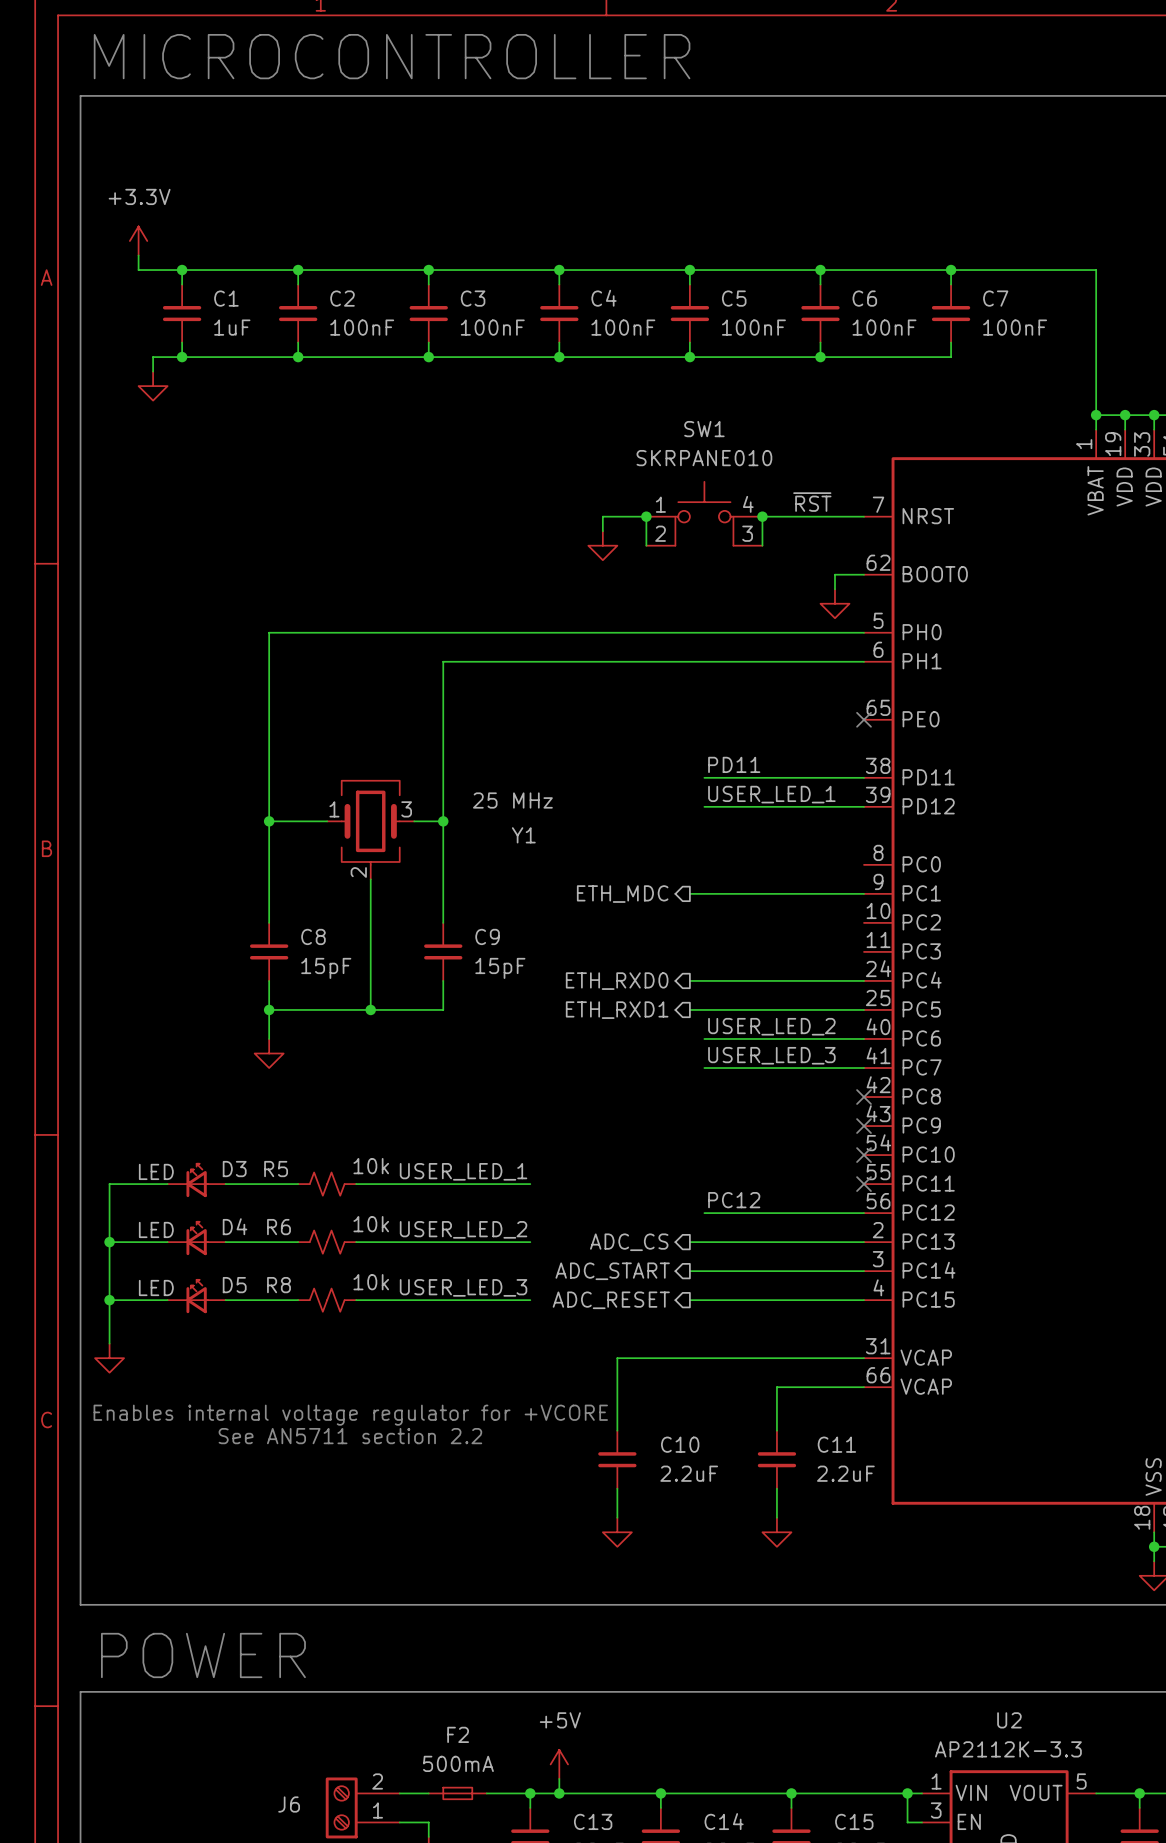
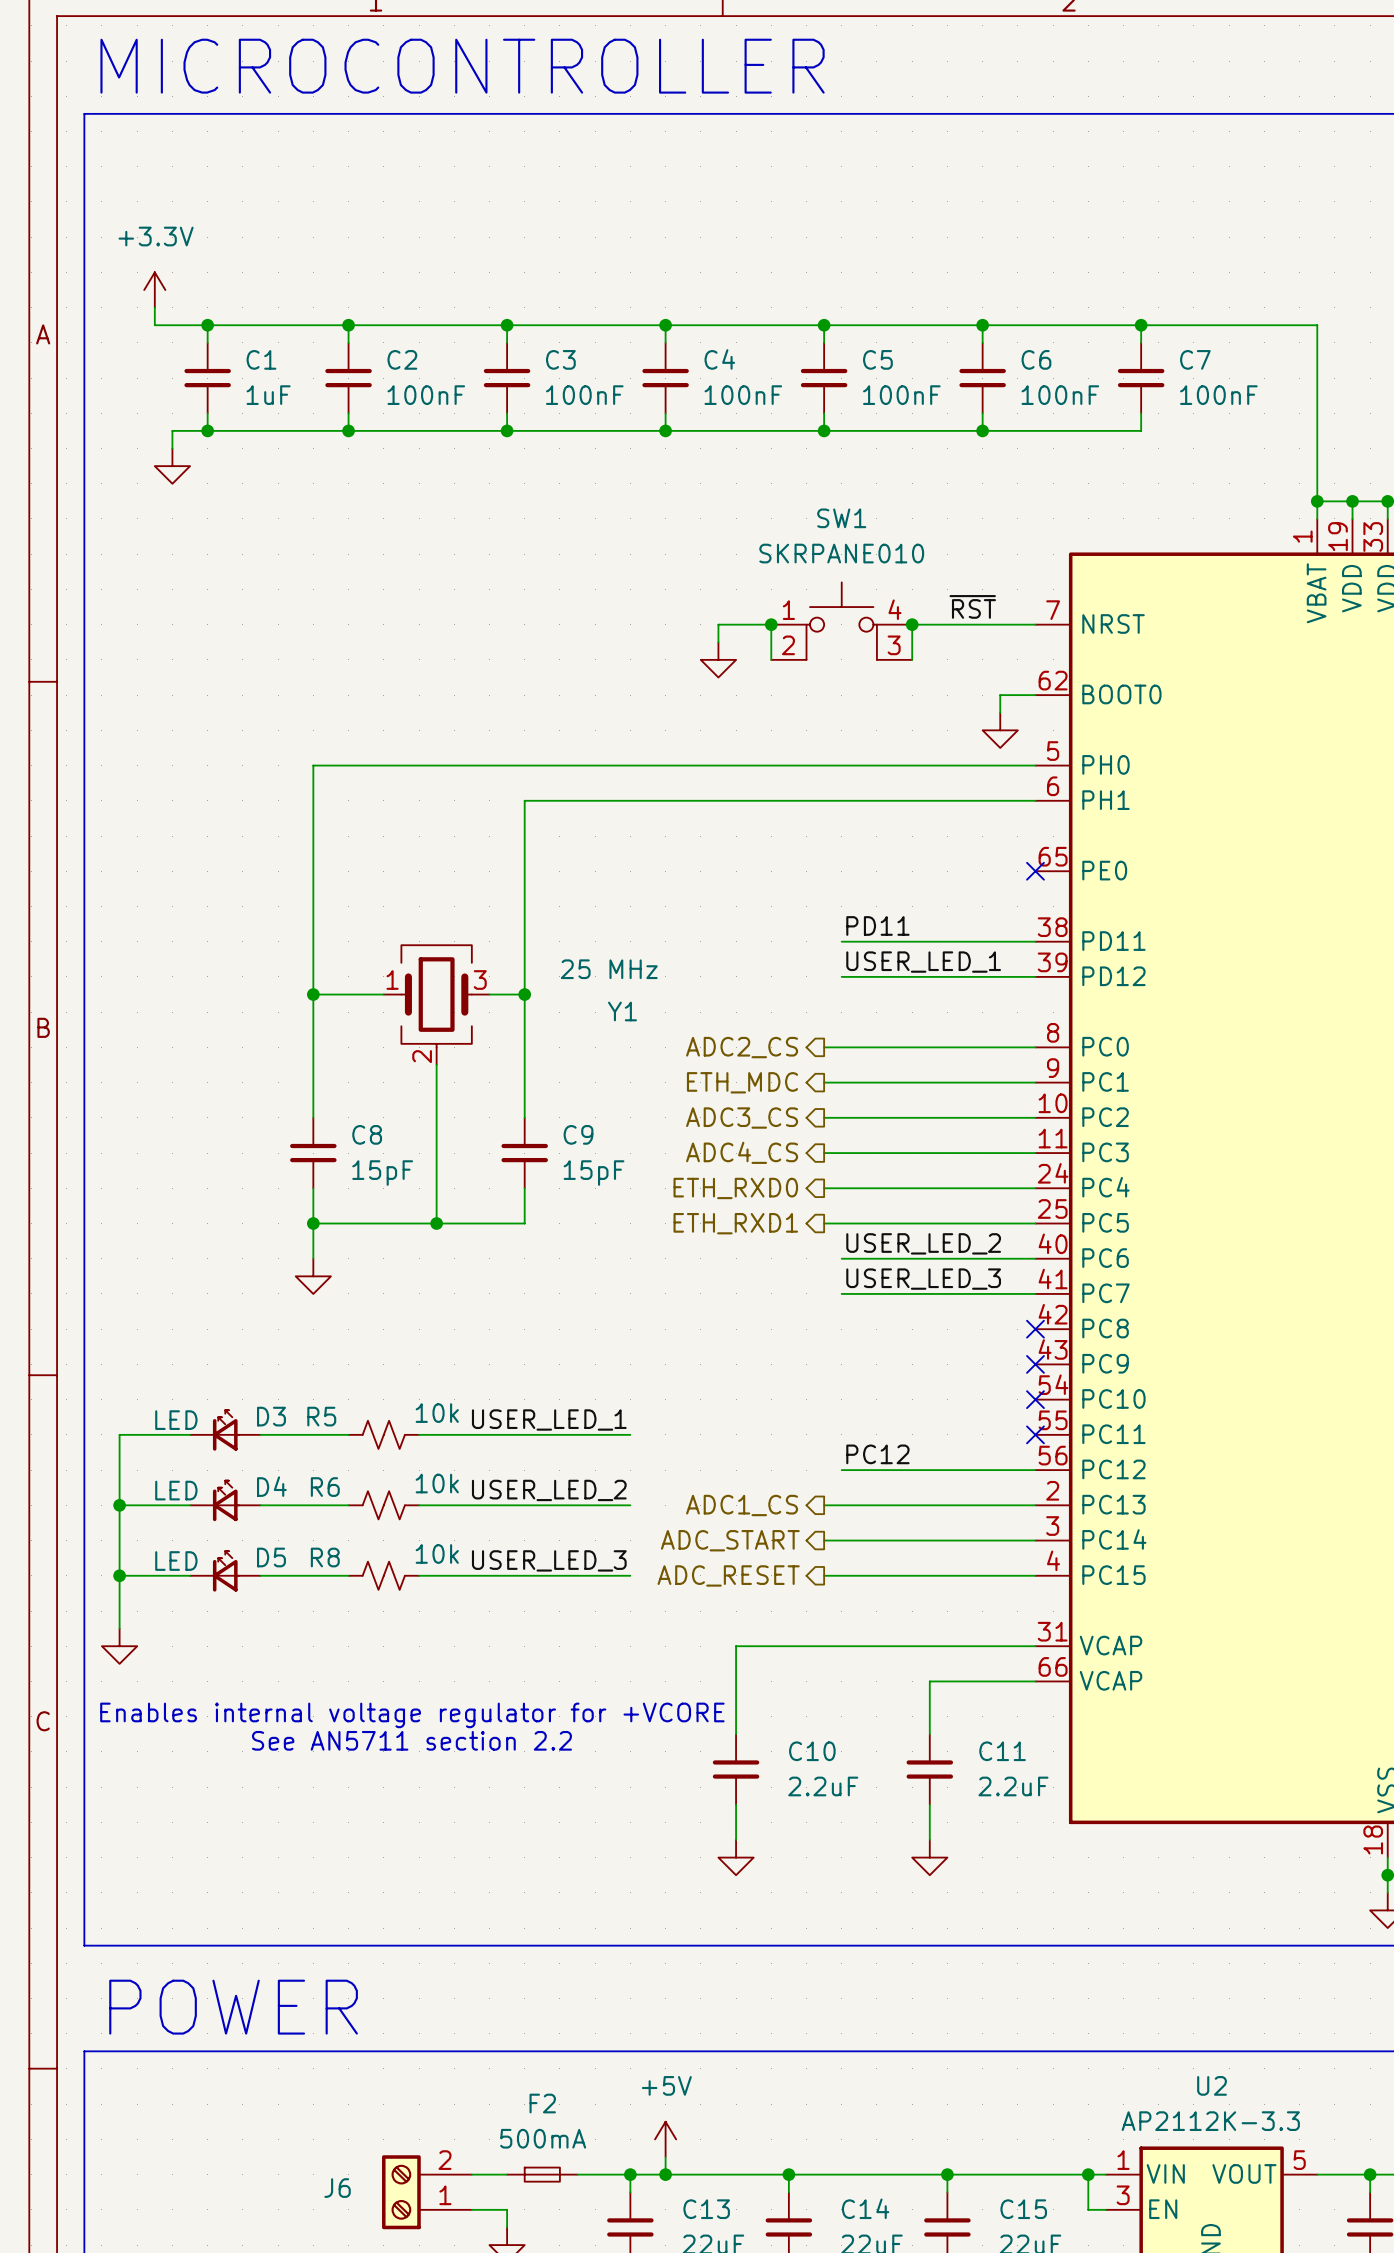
wire: none -> (824, 1047) (1035, 1047)
hierarchical label: none -> ADC2_CS (742, 1047)
wire: none -> (824, 1117) (1035, 1117)
hierarchical label: none -> ADC3_CS (742, 1118)
hierarchical label: none -> ADC4_CS (742, 1152)
wire: none -> (824, 1153) (1035, 1153)
hierarchical label: ADC_CS (629, 1242) -> ADC1_CS (742, 1505)

